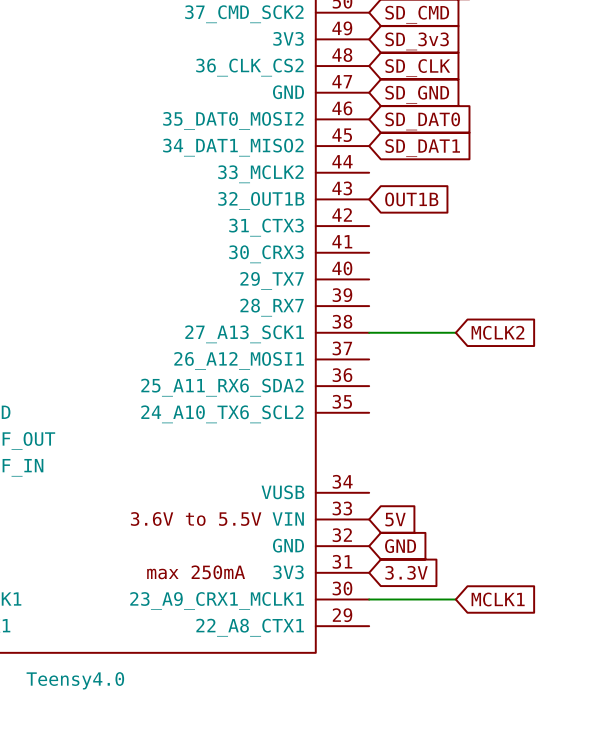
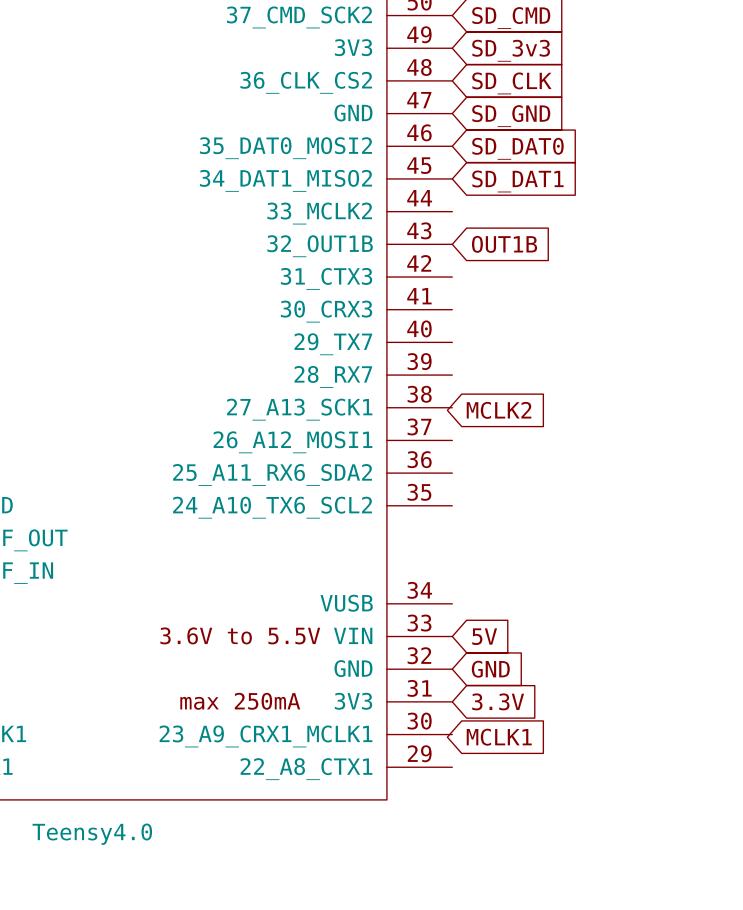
wire: (369, 332) (455, 332) -> none
global label position: MCLK2 (497, 332) -> MCLK2 (499, 410)
wire: (369, 599) (455, 599) -> none
global label position: MCLK1 (498, 599) -> MCLK1 (499, 737)

